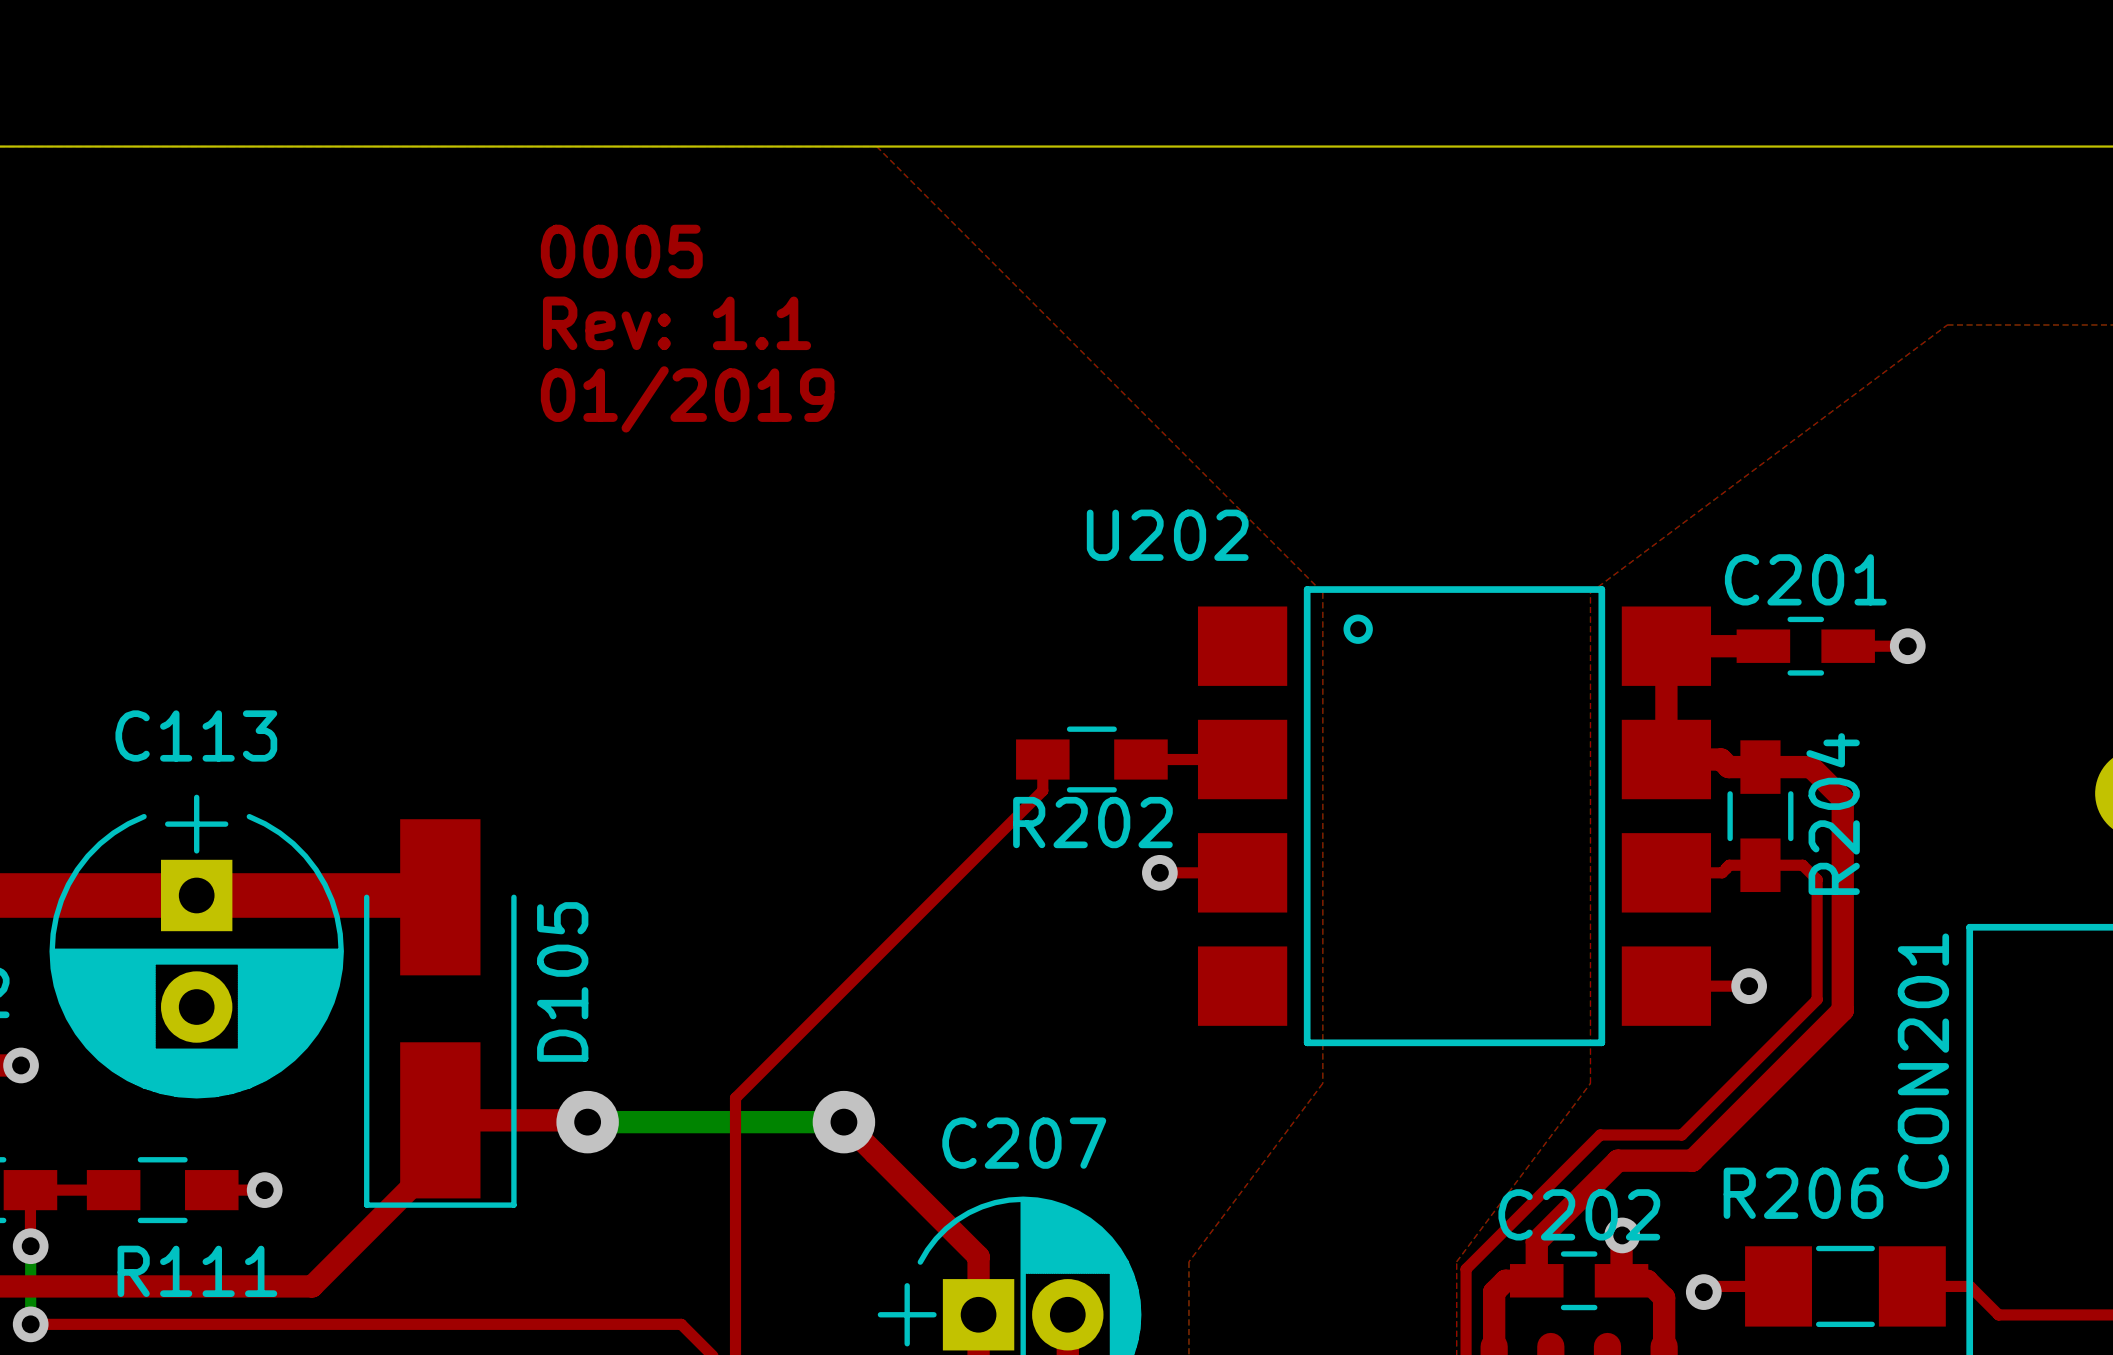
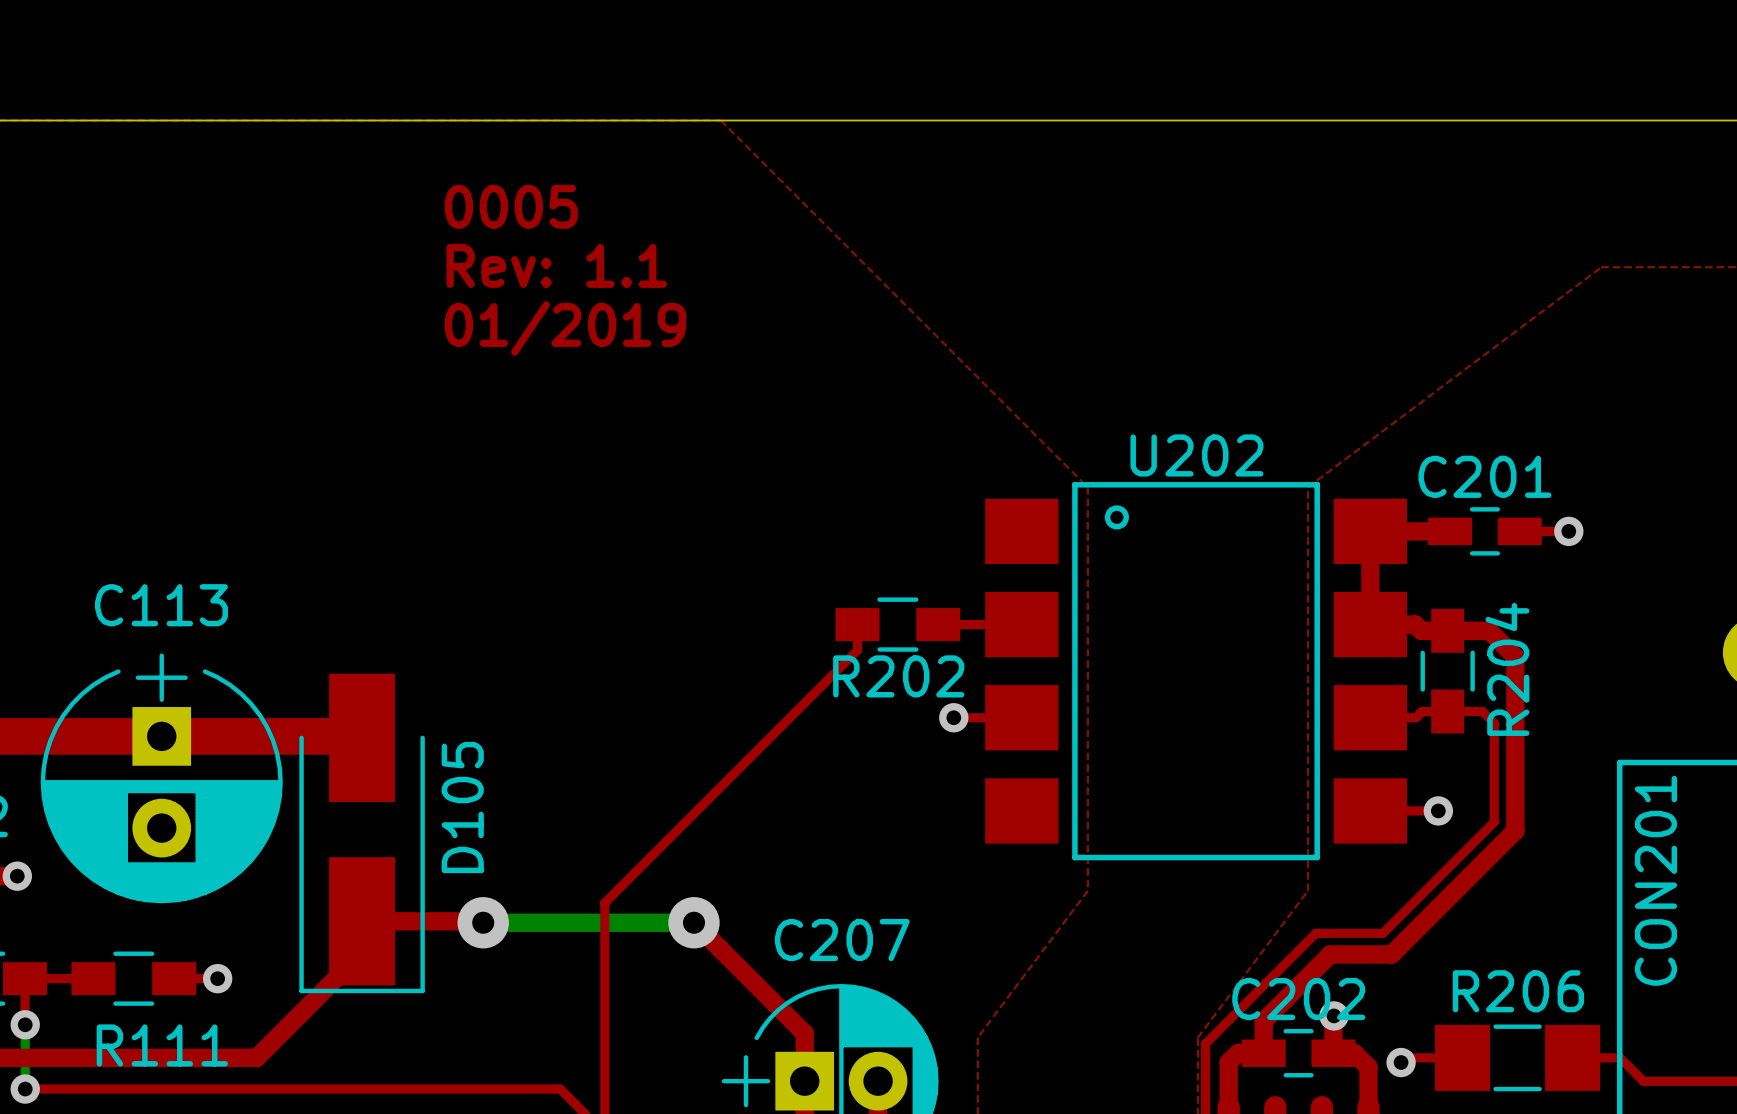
U202 name position: U202 (1167, 535) -> U202 (1196, 455)
CON201 name position: CON201 (1923, 1061) -> CON201 (1655, 880)
R206 name position: R206 (1803, 1193) -> R206 (1518, 991)

